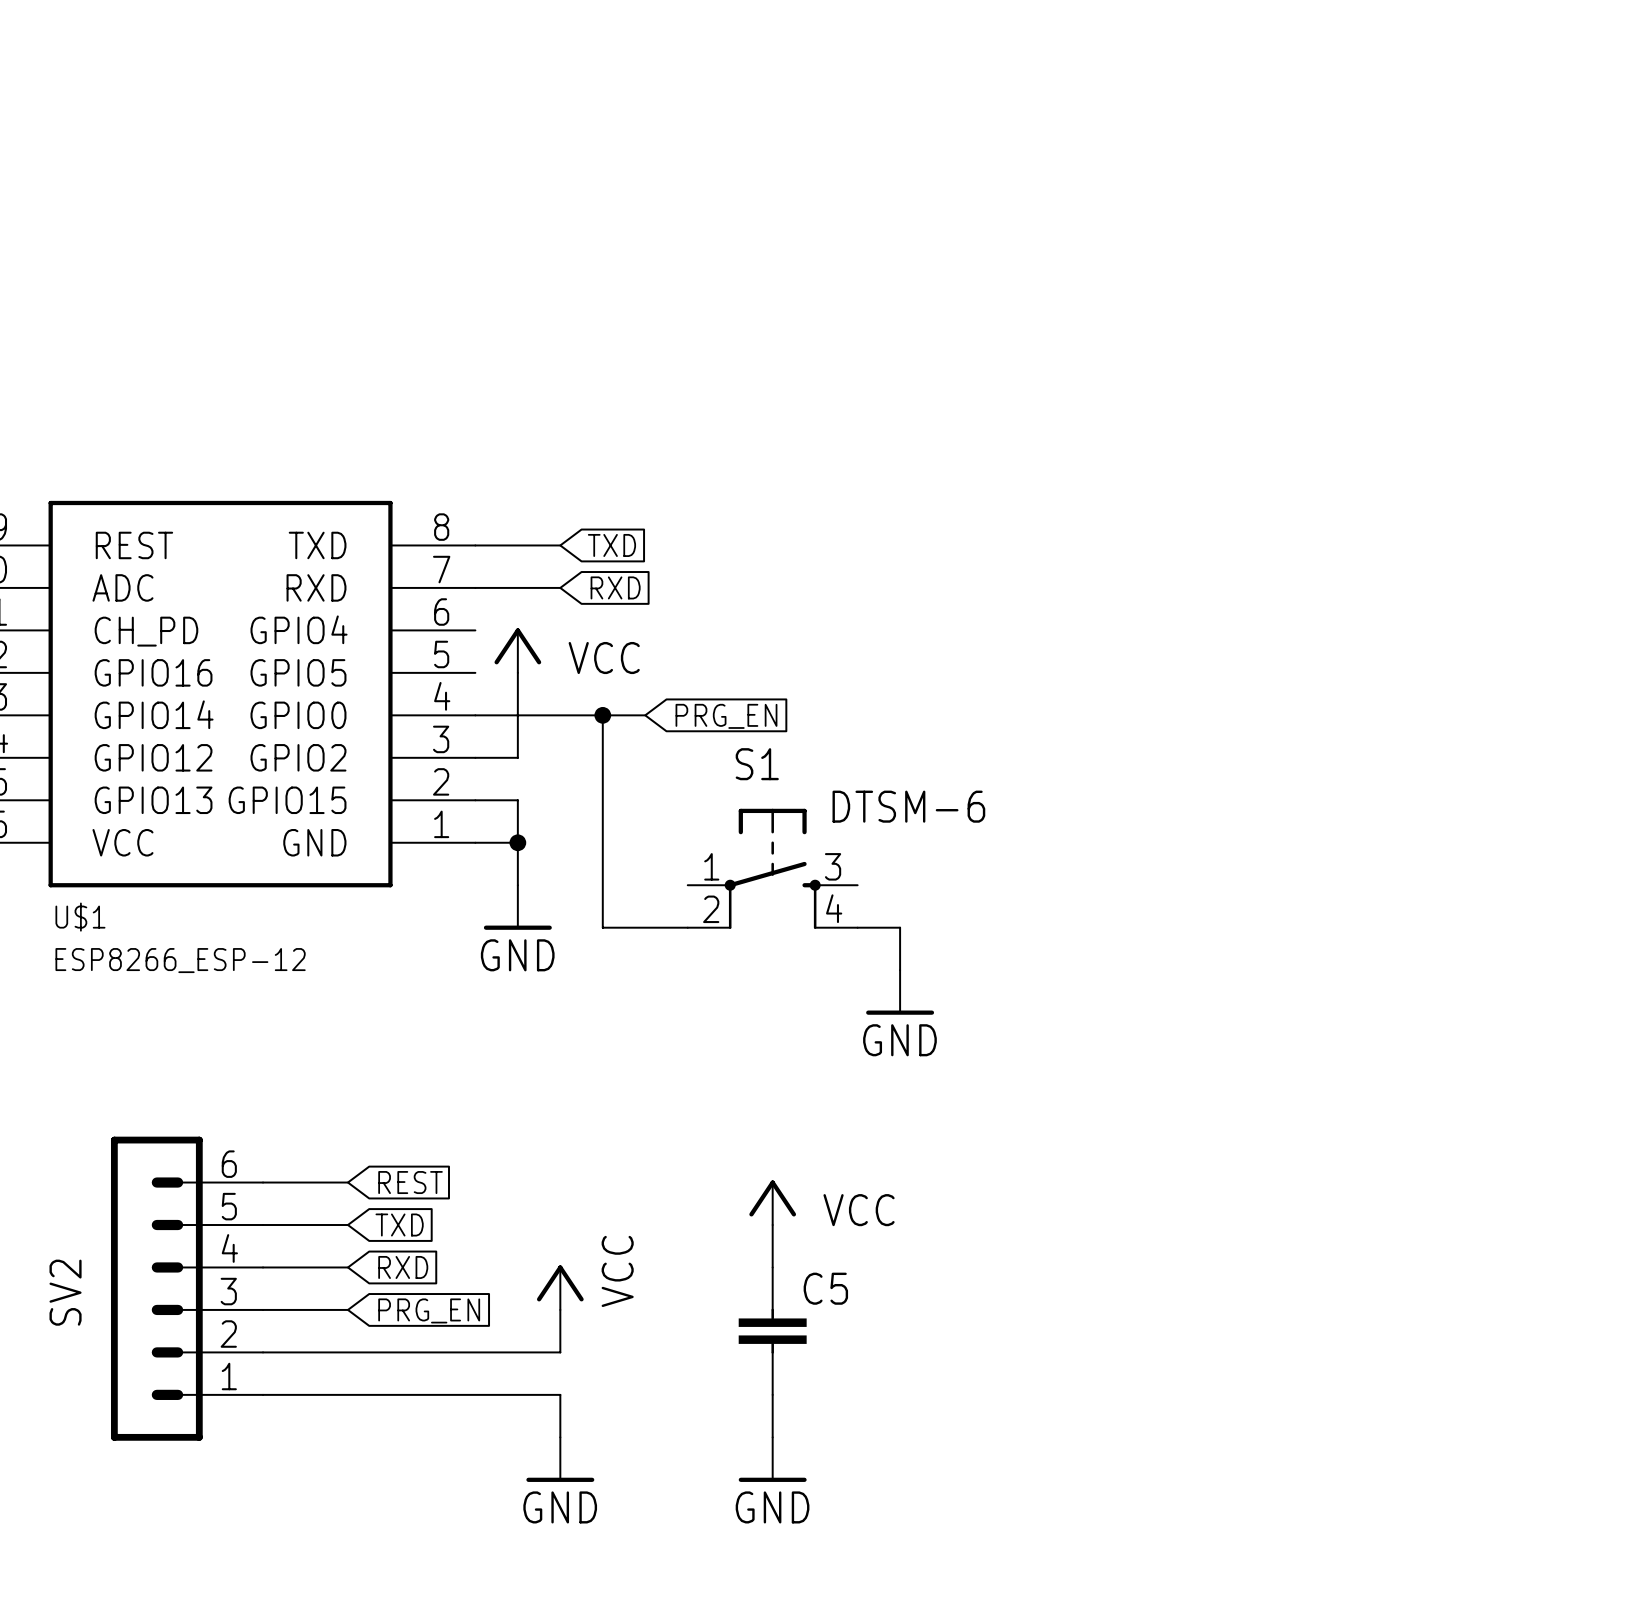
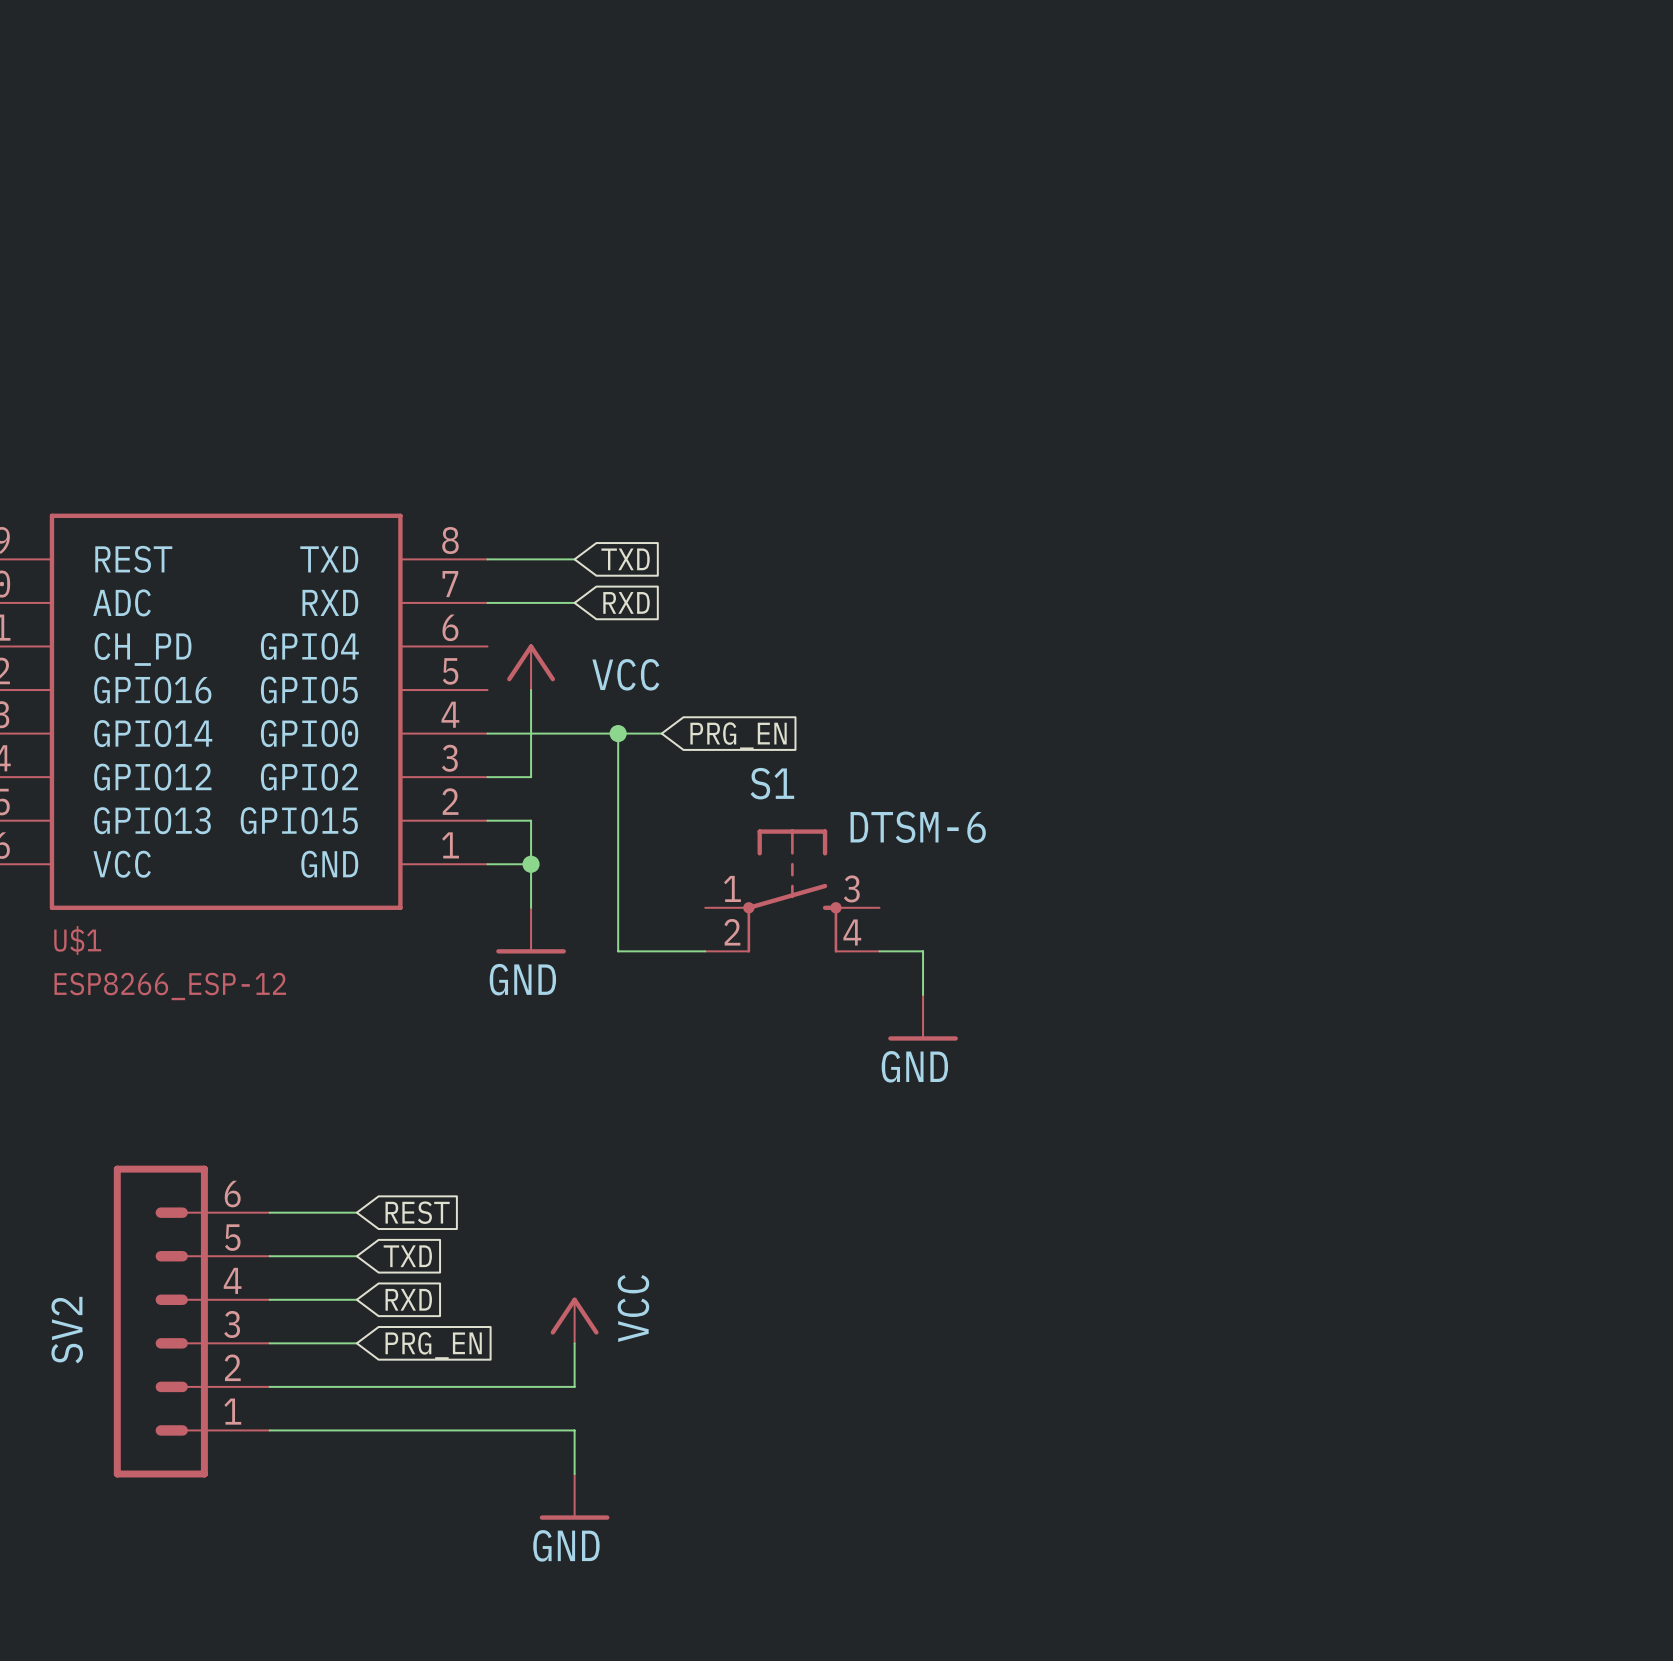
power symbol: VCC (772, 1202) -> none
wire: (772, 1225) (772, 1267) -> none
C5: (772, 1331) -> none
wire: (772, 1394) (772, 1437) -> none
power symbol: GND (772, 1459) -> none

